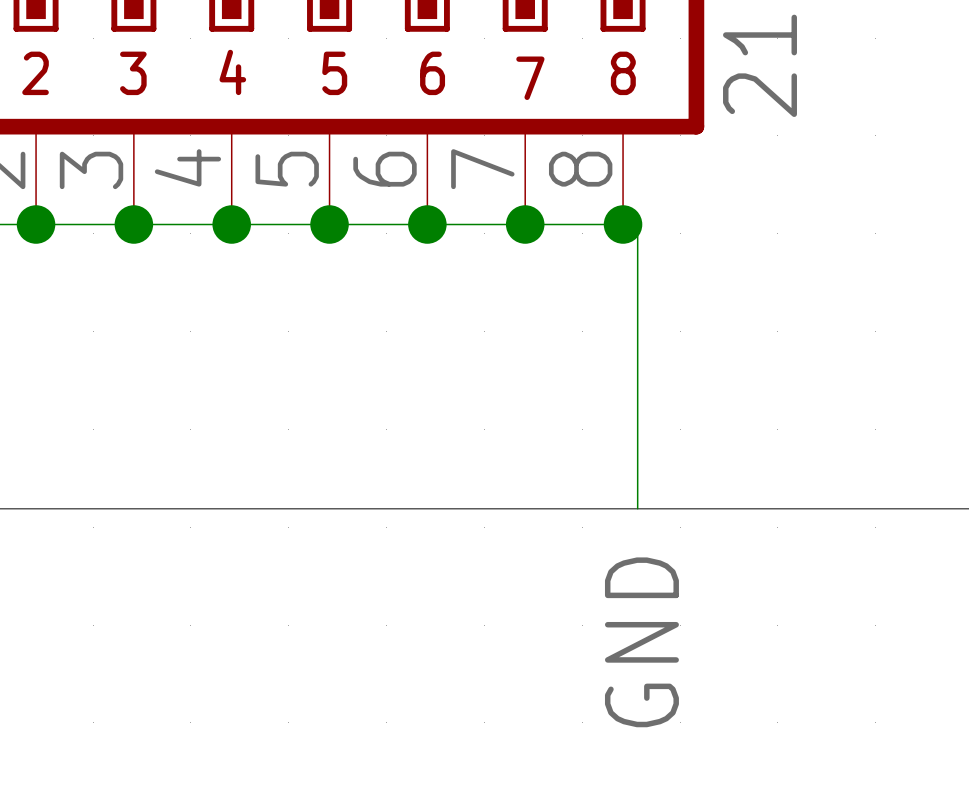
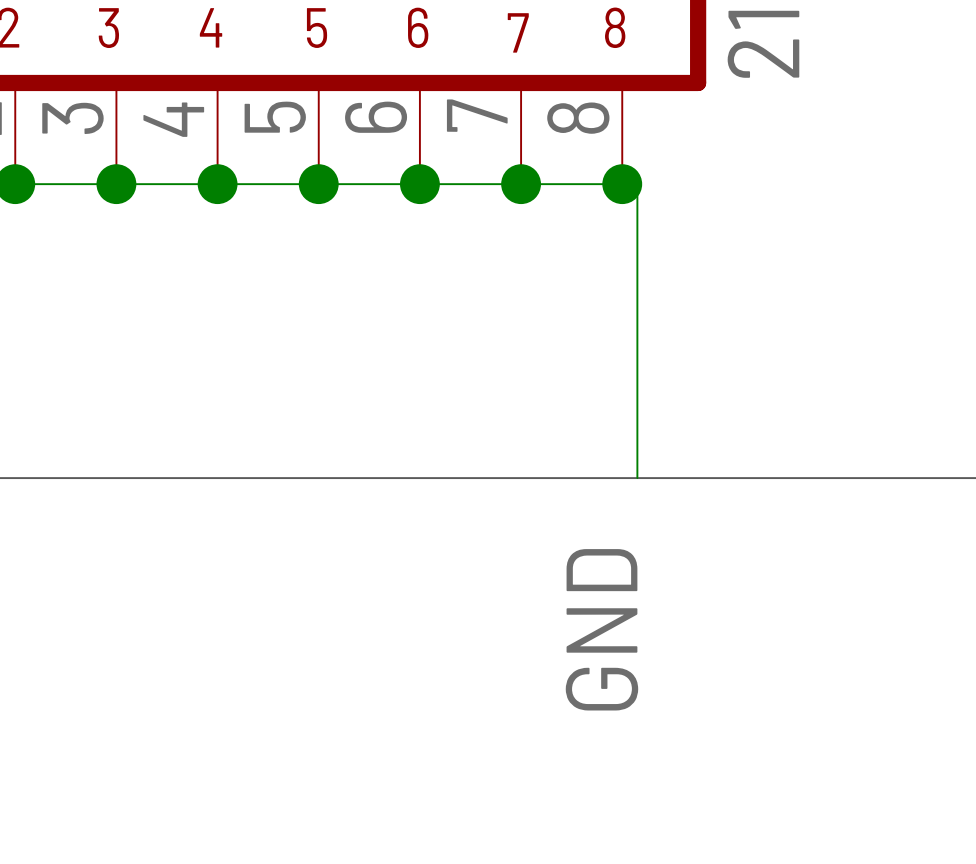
label position: GND (641, 642) -> GND (601, 629)

